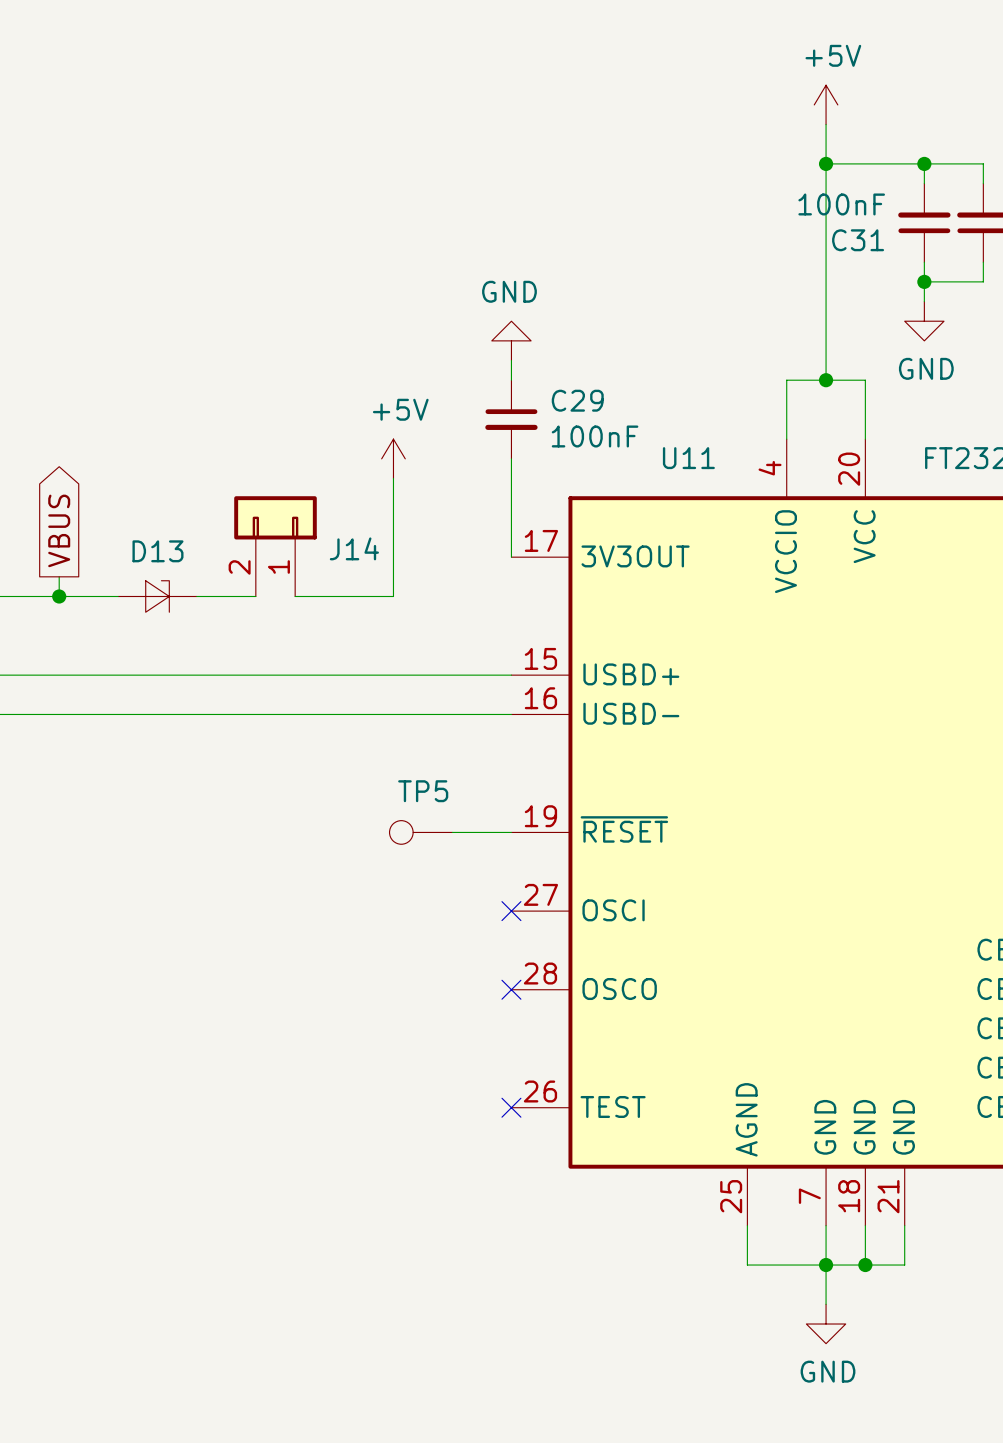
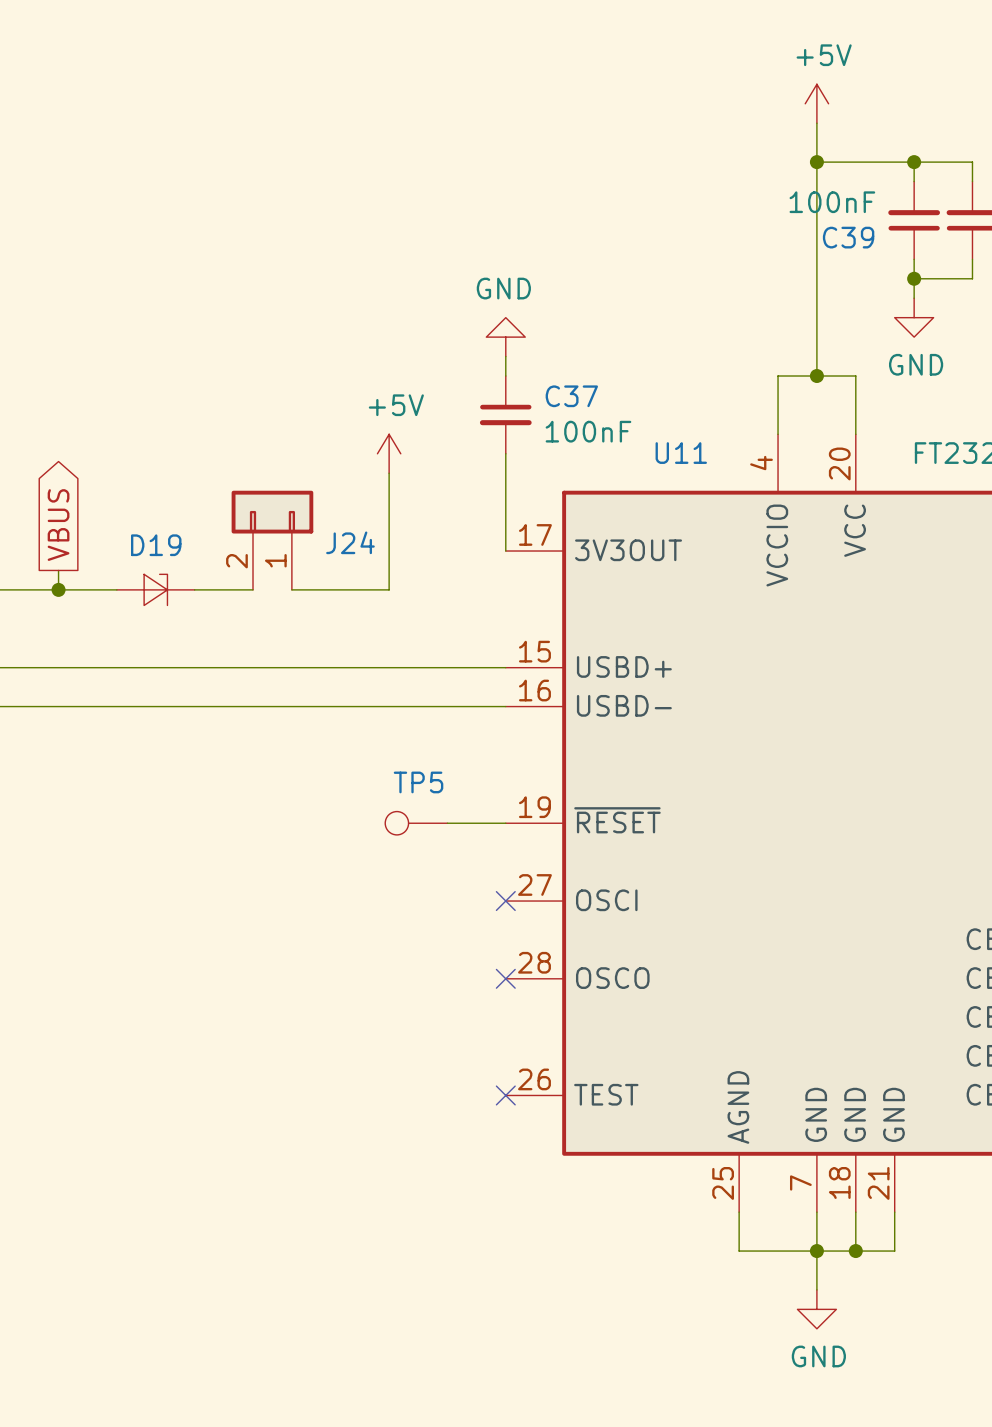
C31 name: C31 (858, 240) -> C39 (848, 237)
C29 name: C29 (577, 400) -> C37 (571, 396)
J14 name: J14 (354, 548) -> J24 (350, 542)
D13 name: D13 (157, 551) -> D19 (156, 545)

